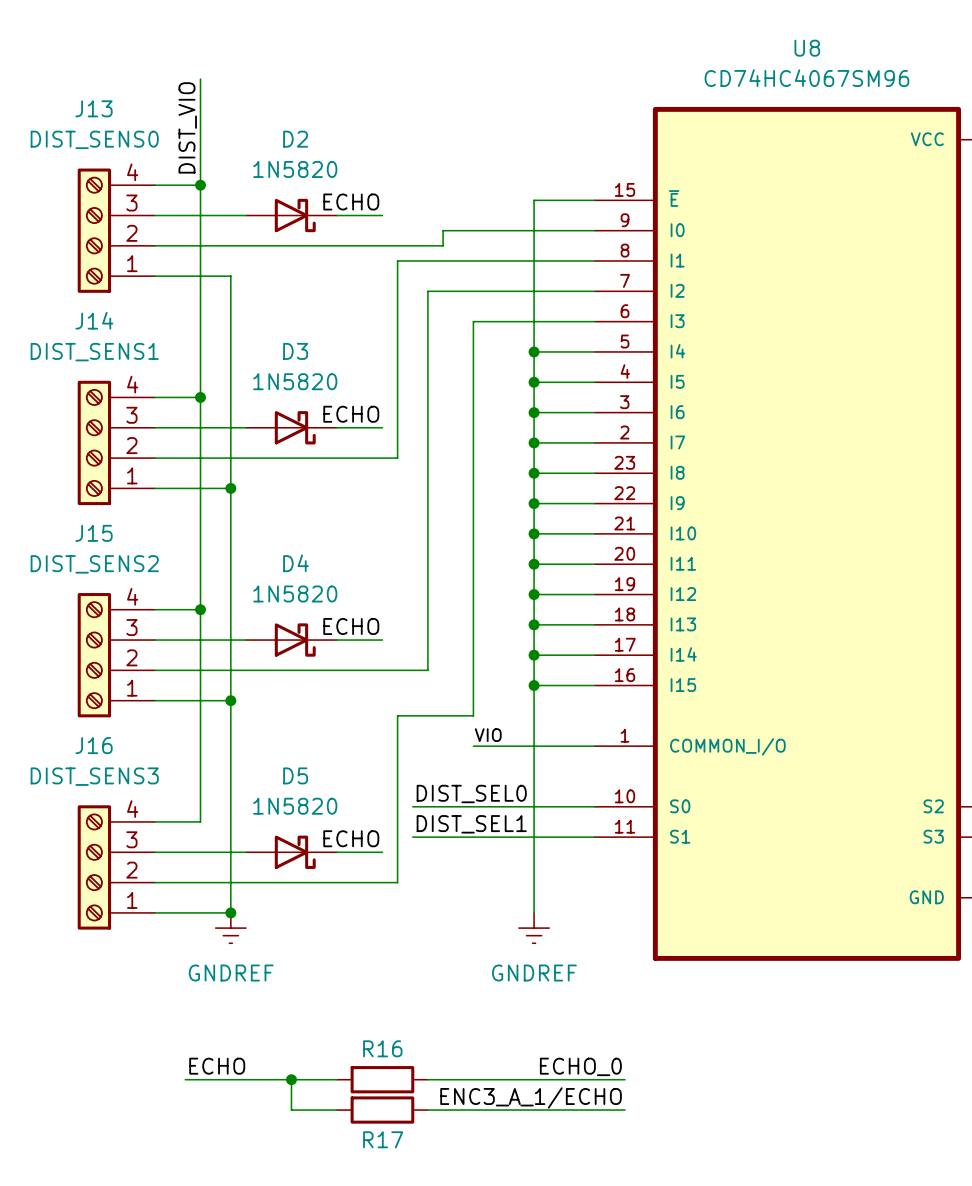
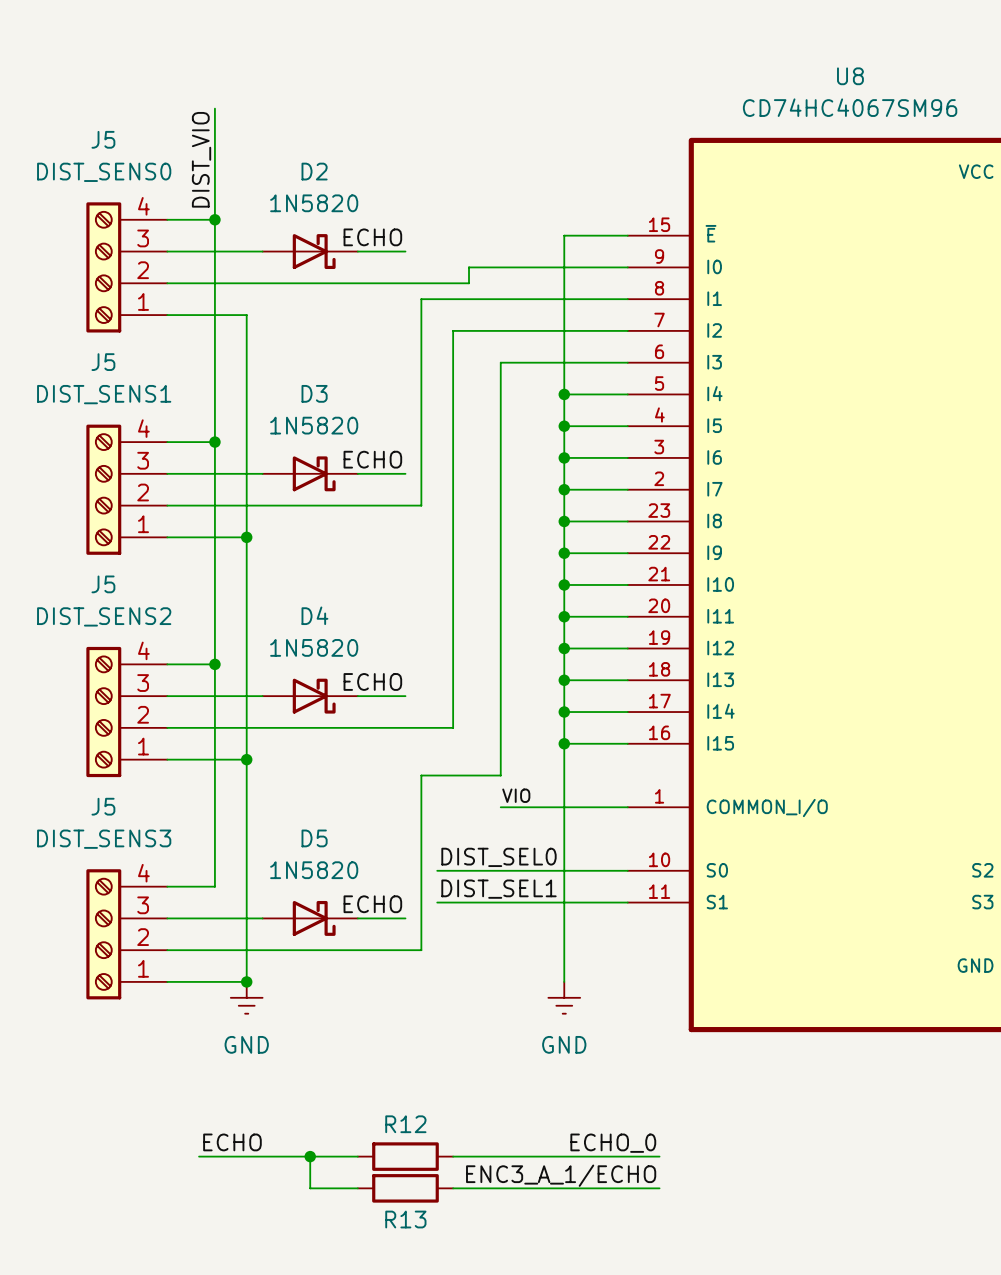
J13 name: J13 (94, 108) -> J5 (103, 139)
J14 name: J14 (94, 320) -> J5 (103, 362)
J15 name: J15 (94, 533) -> J5 (103, 584)
J16 name: J16 (94, 745) -> J5 (103, 806)
power symbol: GNDREF (230, 928) -> GND (246, 997)
power symbol: GNDREF (534, 928) -> GND (564, 997)
R16 name: R16 (382, 1048) -> R12 (405, 1124)
R17 name: R17 (383, 1139) -> R13 (405, 1219)

